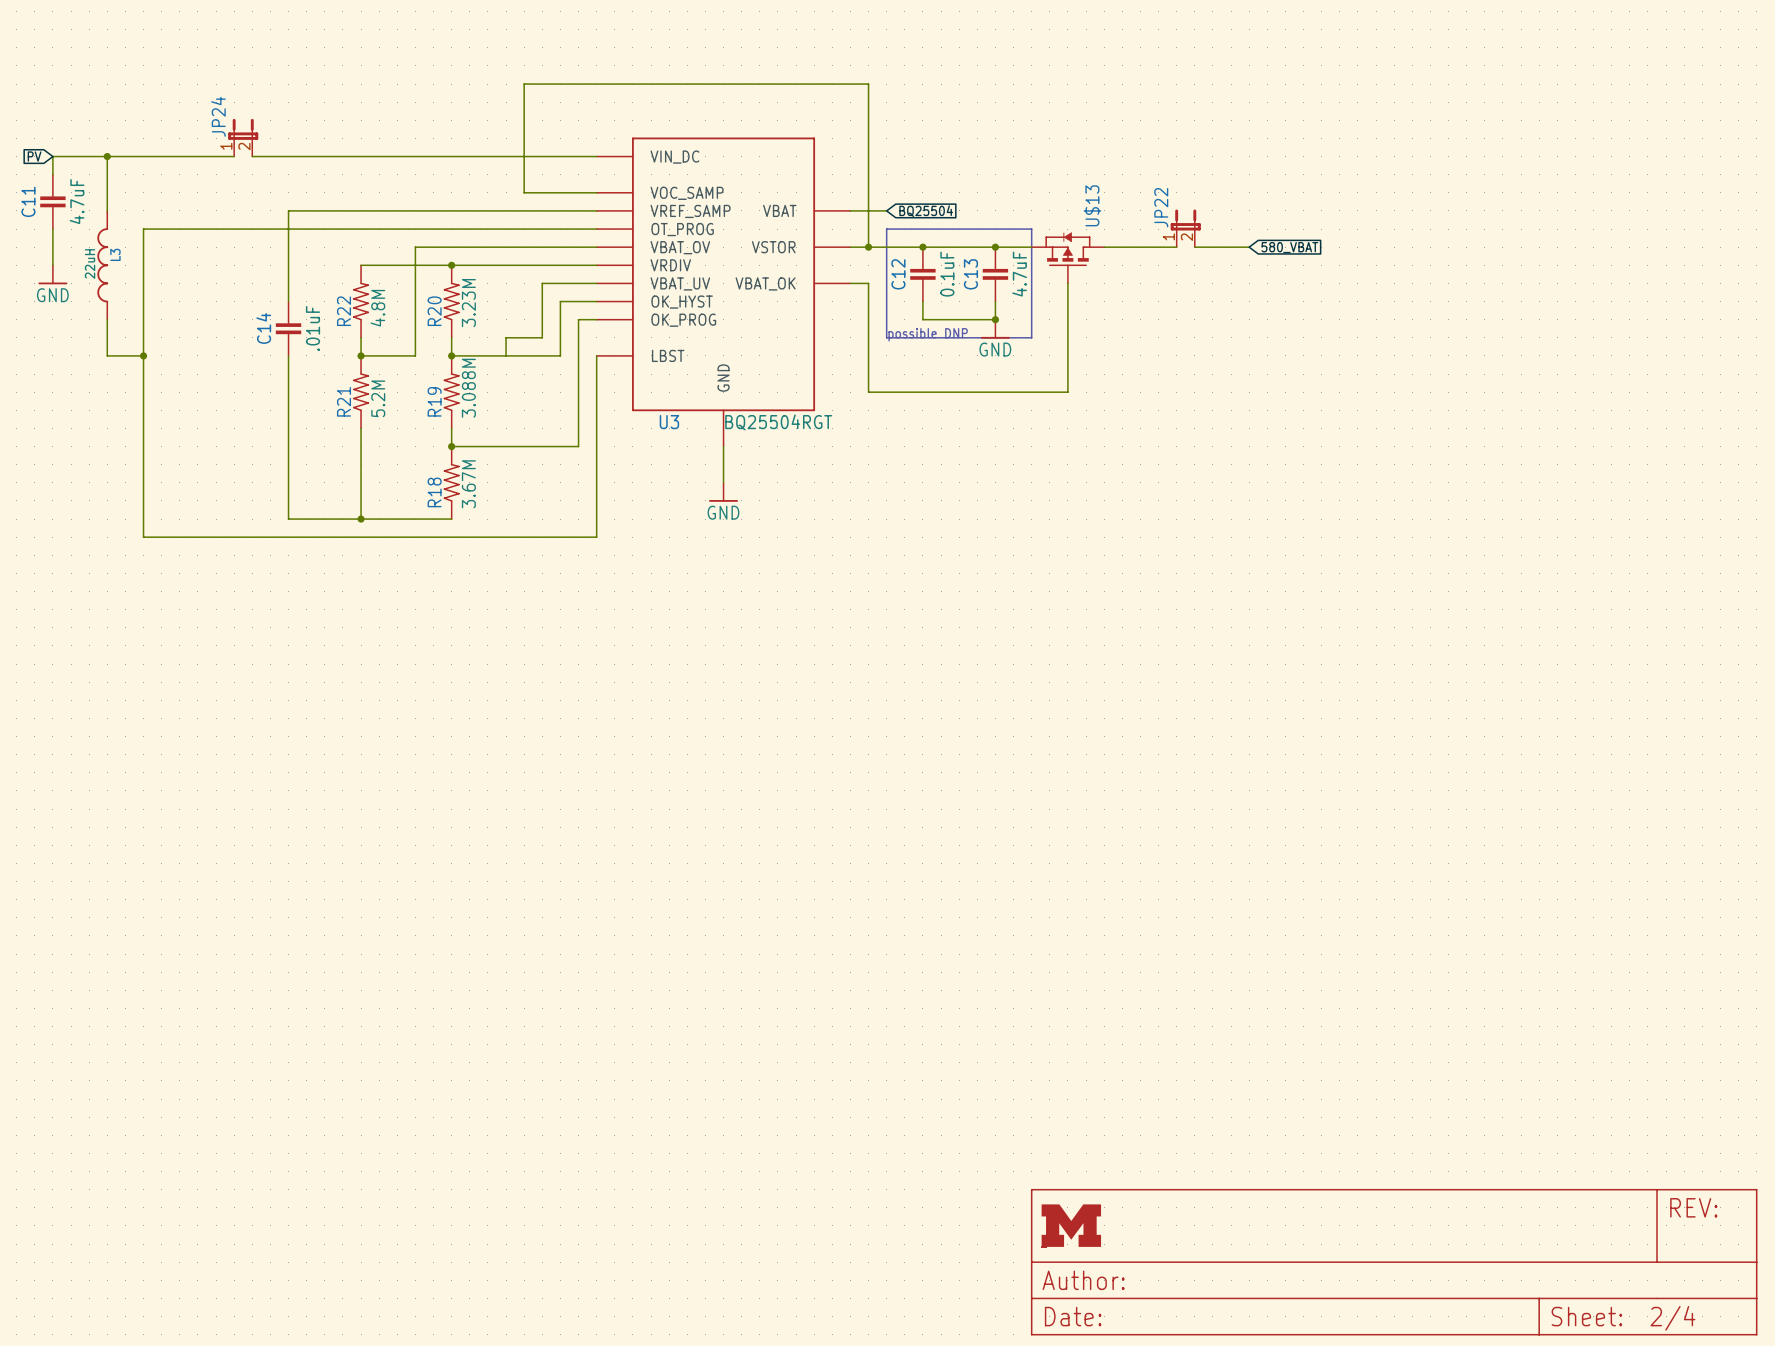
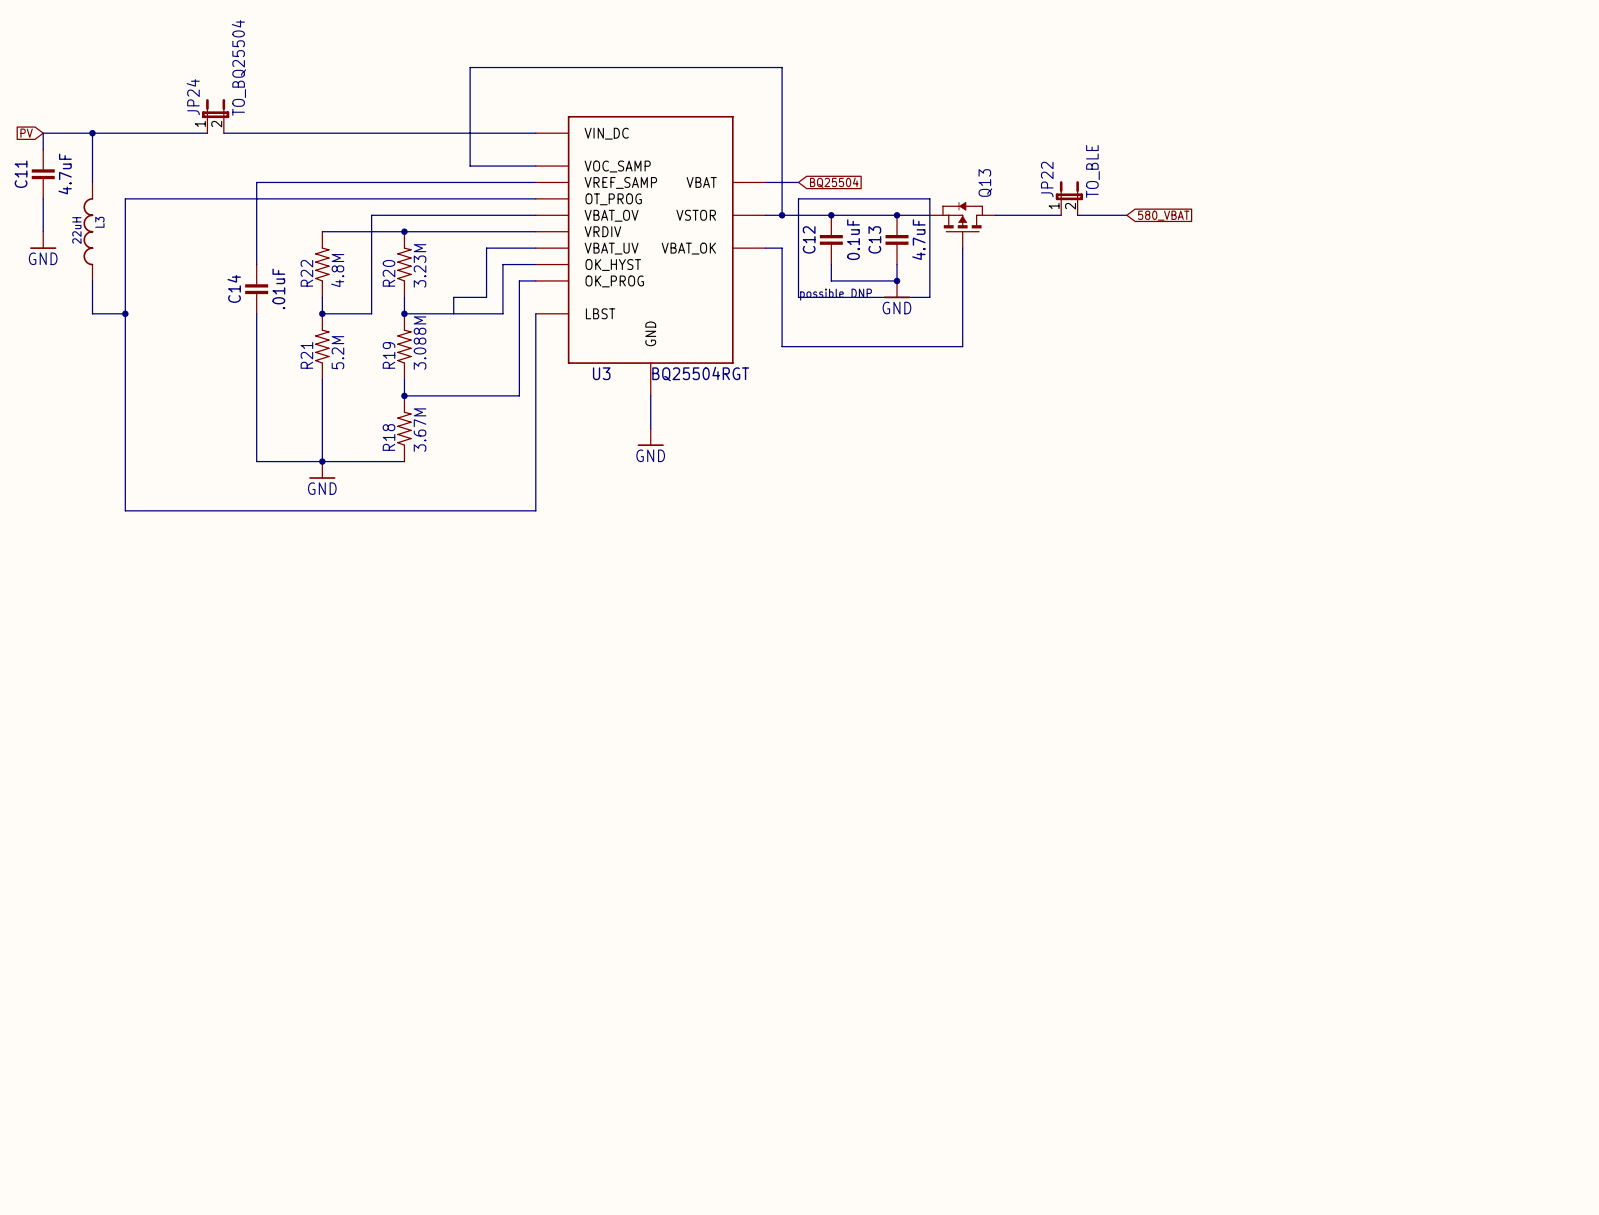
JP24 value: none -> TO_BQ25504 (238, 67)
JP22 value: none -> TO_BLE (1092, 171)
U$13 name: U$13 (1092, 205) -> Q13 (985, 183)
power symbol: none -> GND (322, 470)
wire: (143, 537) (596, 537) -> (125, 477) (125, 510) (535, 510) (535, 477)
part: (1394, 1262) -> none

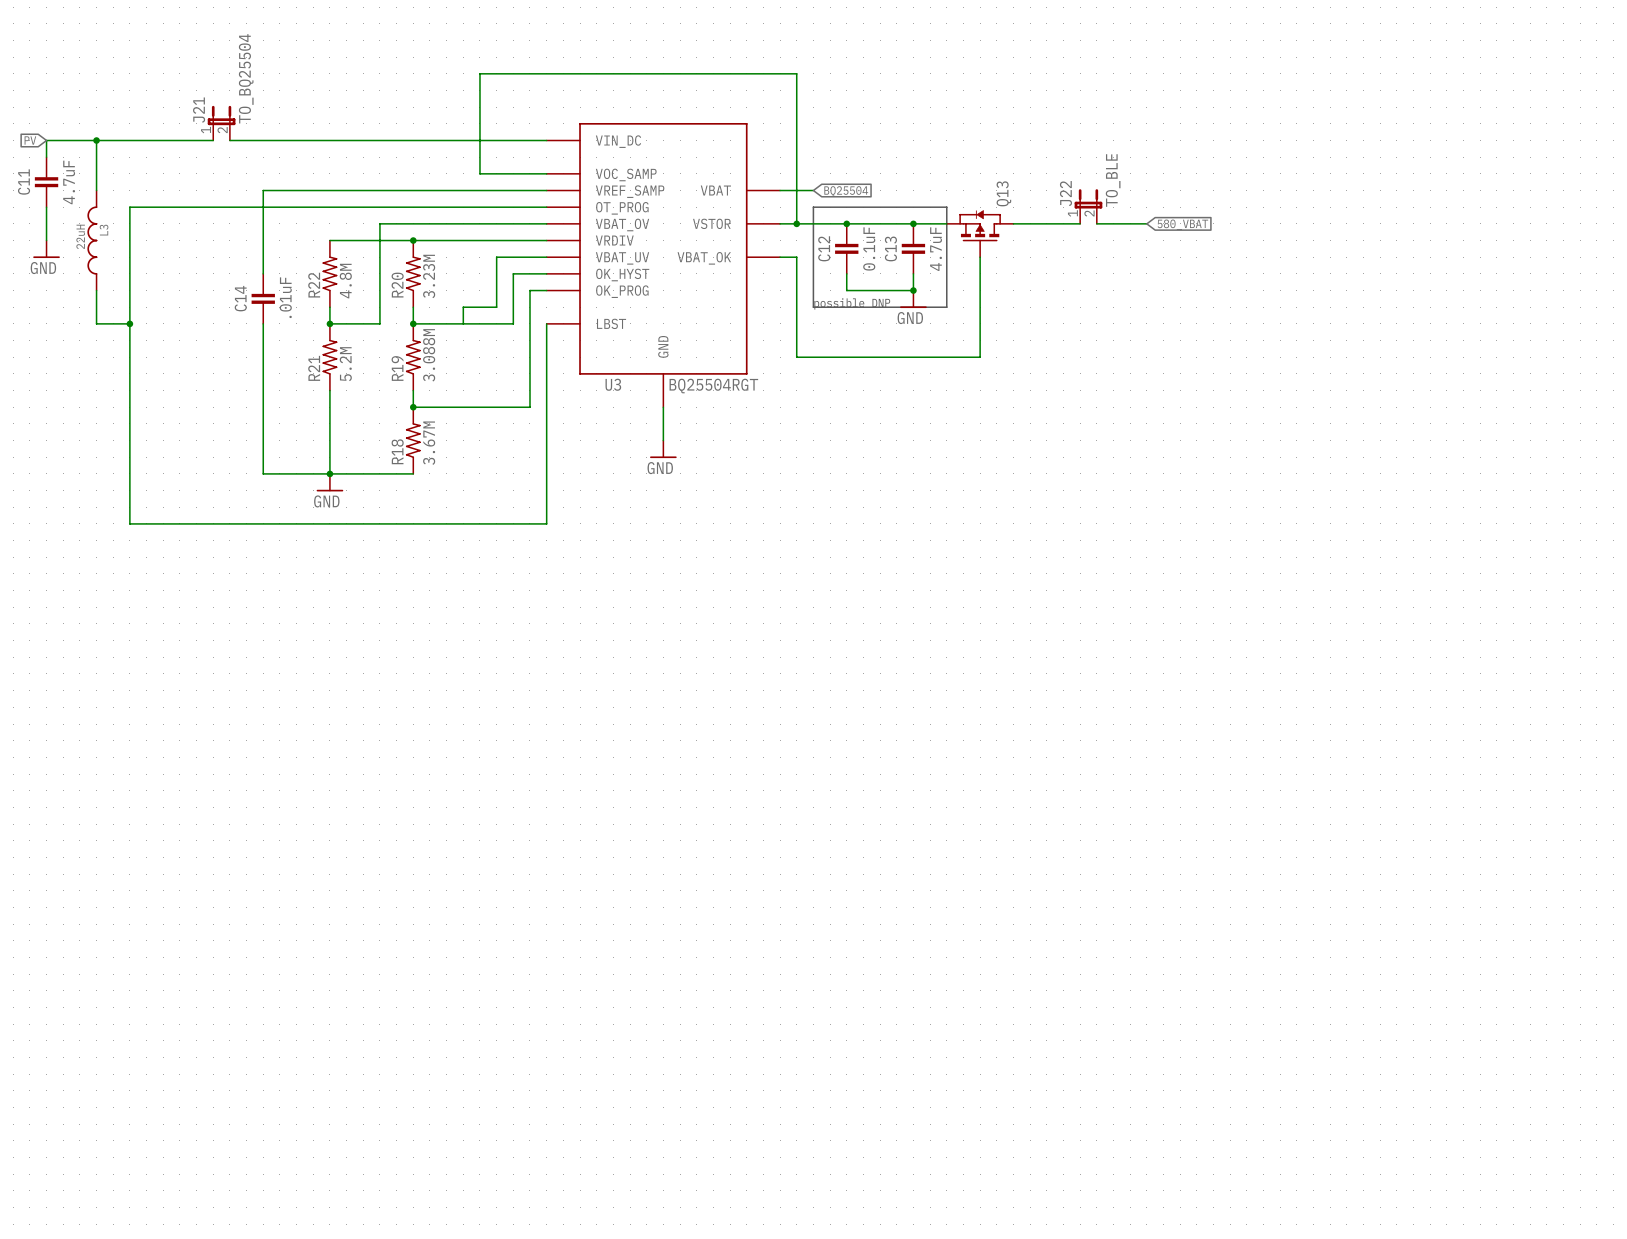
JP24 name: JP24 (193, 97) -> J21 (199, 110)
JP22 name: JP22 (1047, 179) -> J22 (1065, 193)

